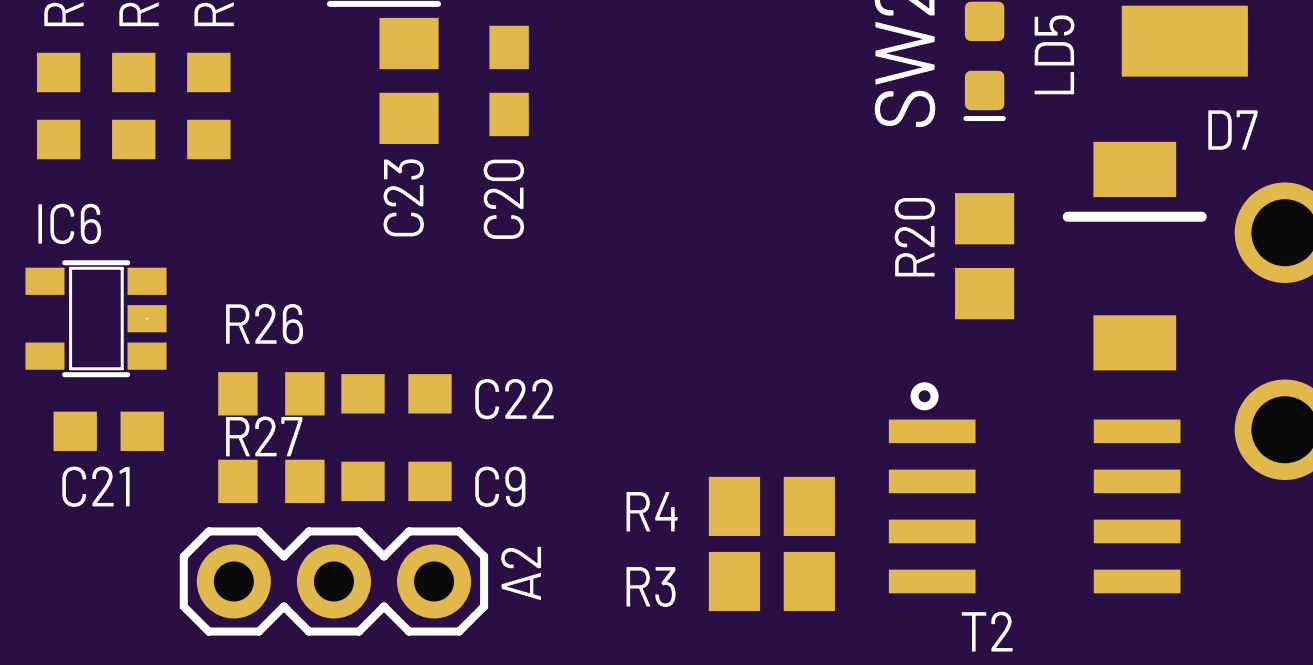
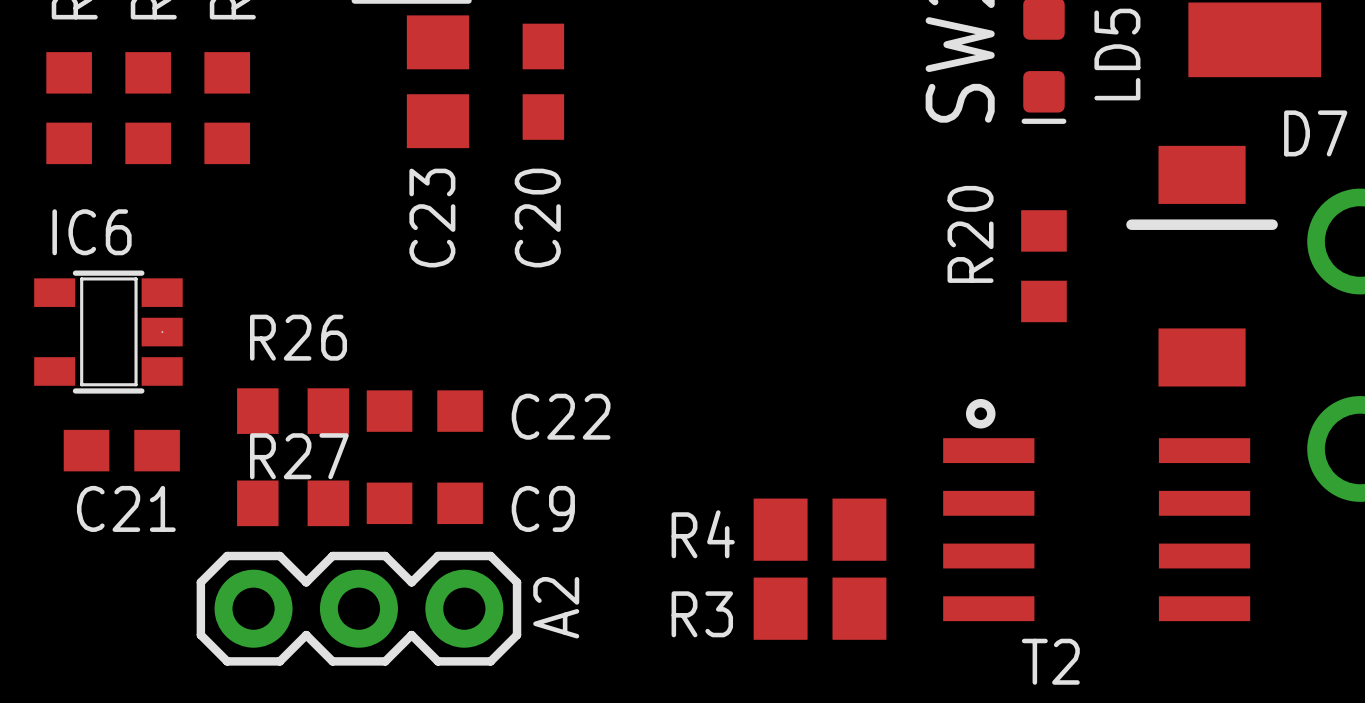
R20 footprint: [955, 193, 1015, 320] -> [1021, 210, 1067, 323]

